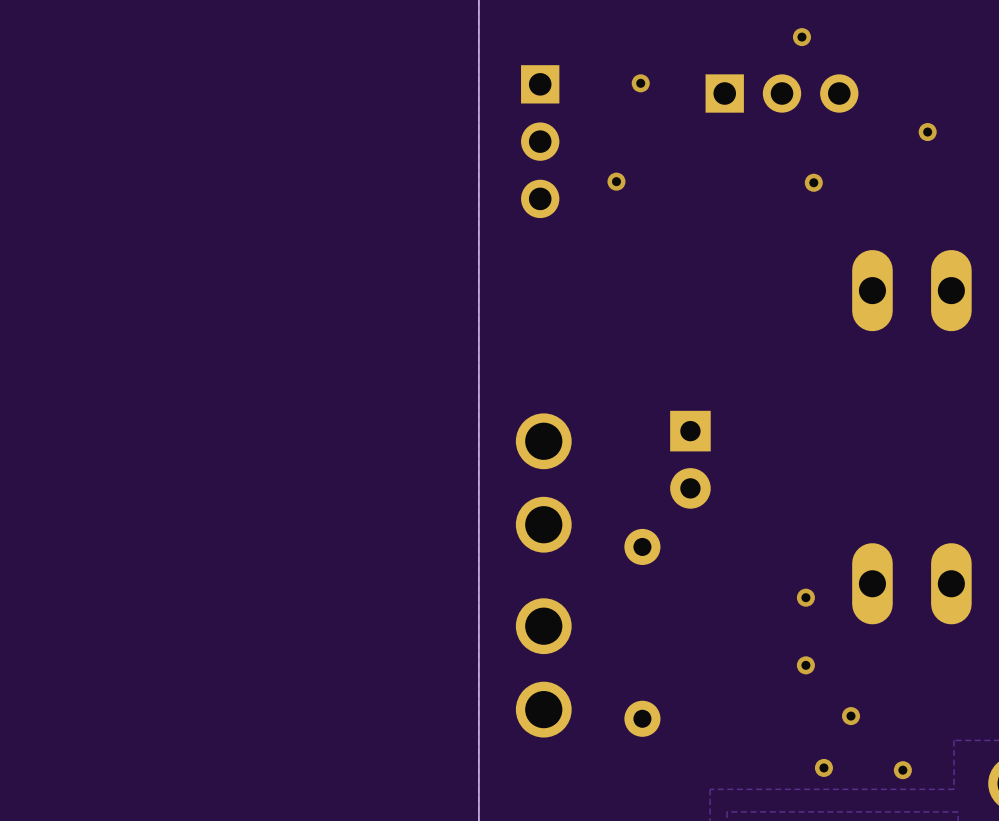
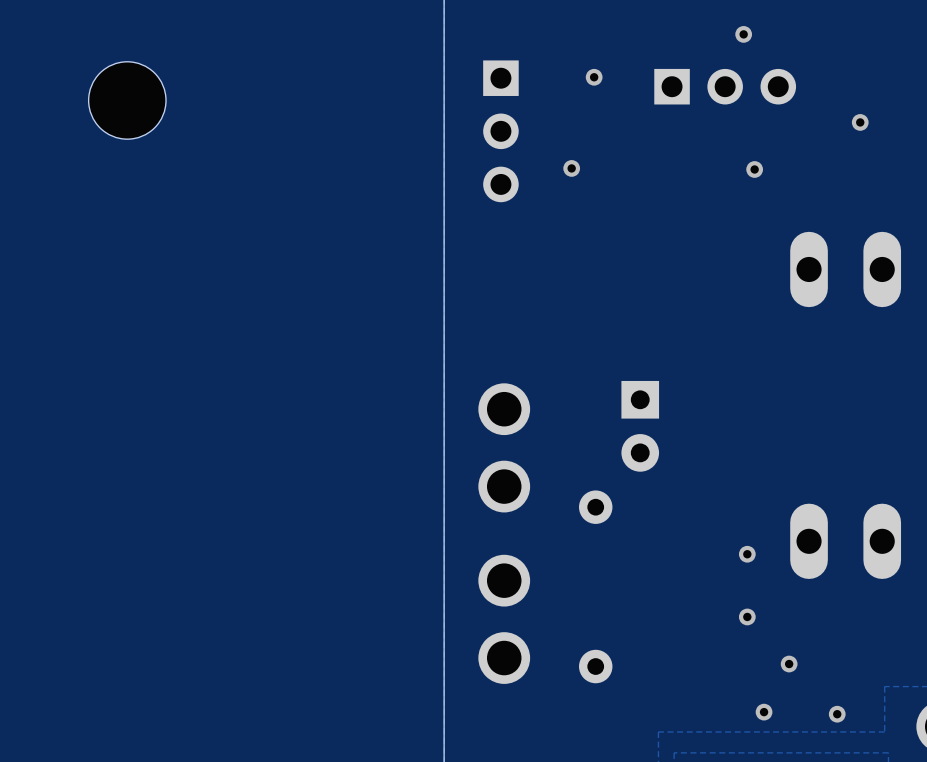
part: none -> (127, 100)

